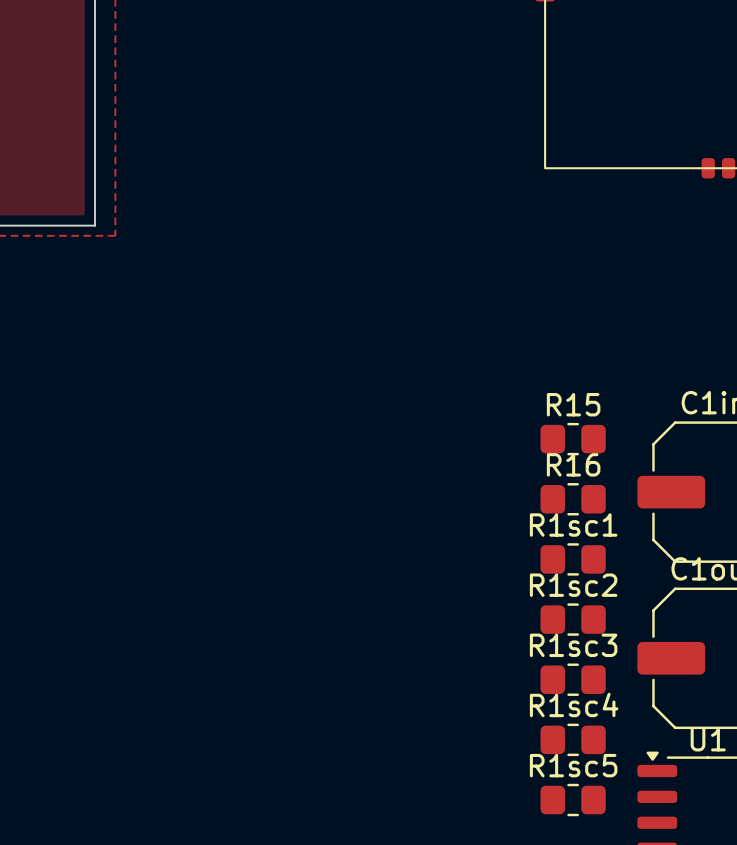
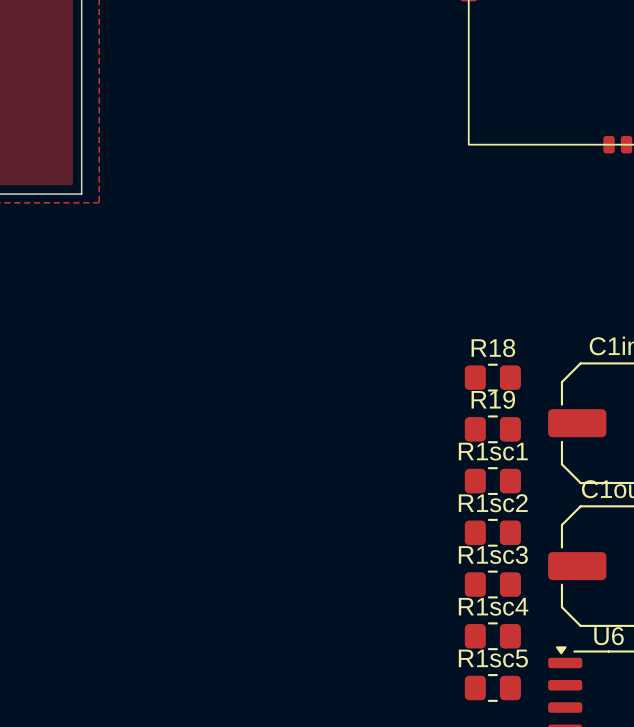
R15 name: R15 (573, 404) -> R18 (493, 348)
R16 name: R16 (573, 464) -> R19 (493, 399)
U1 name: U1 (708, 739) -> U6 (609, 636)

